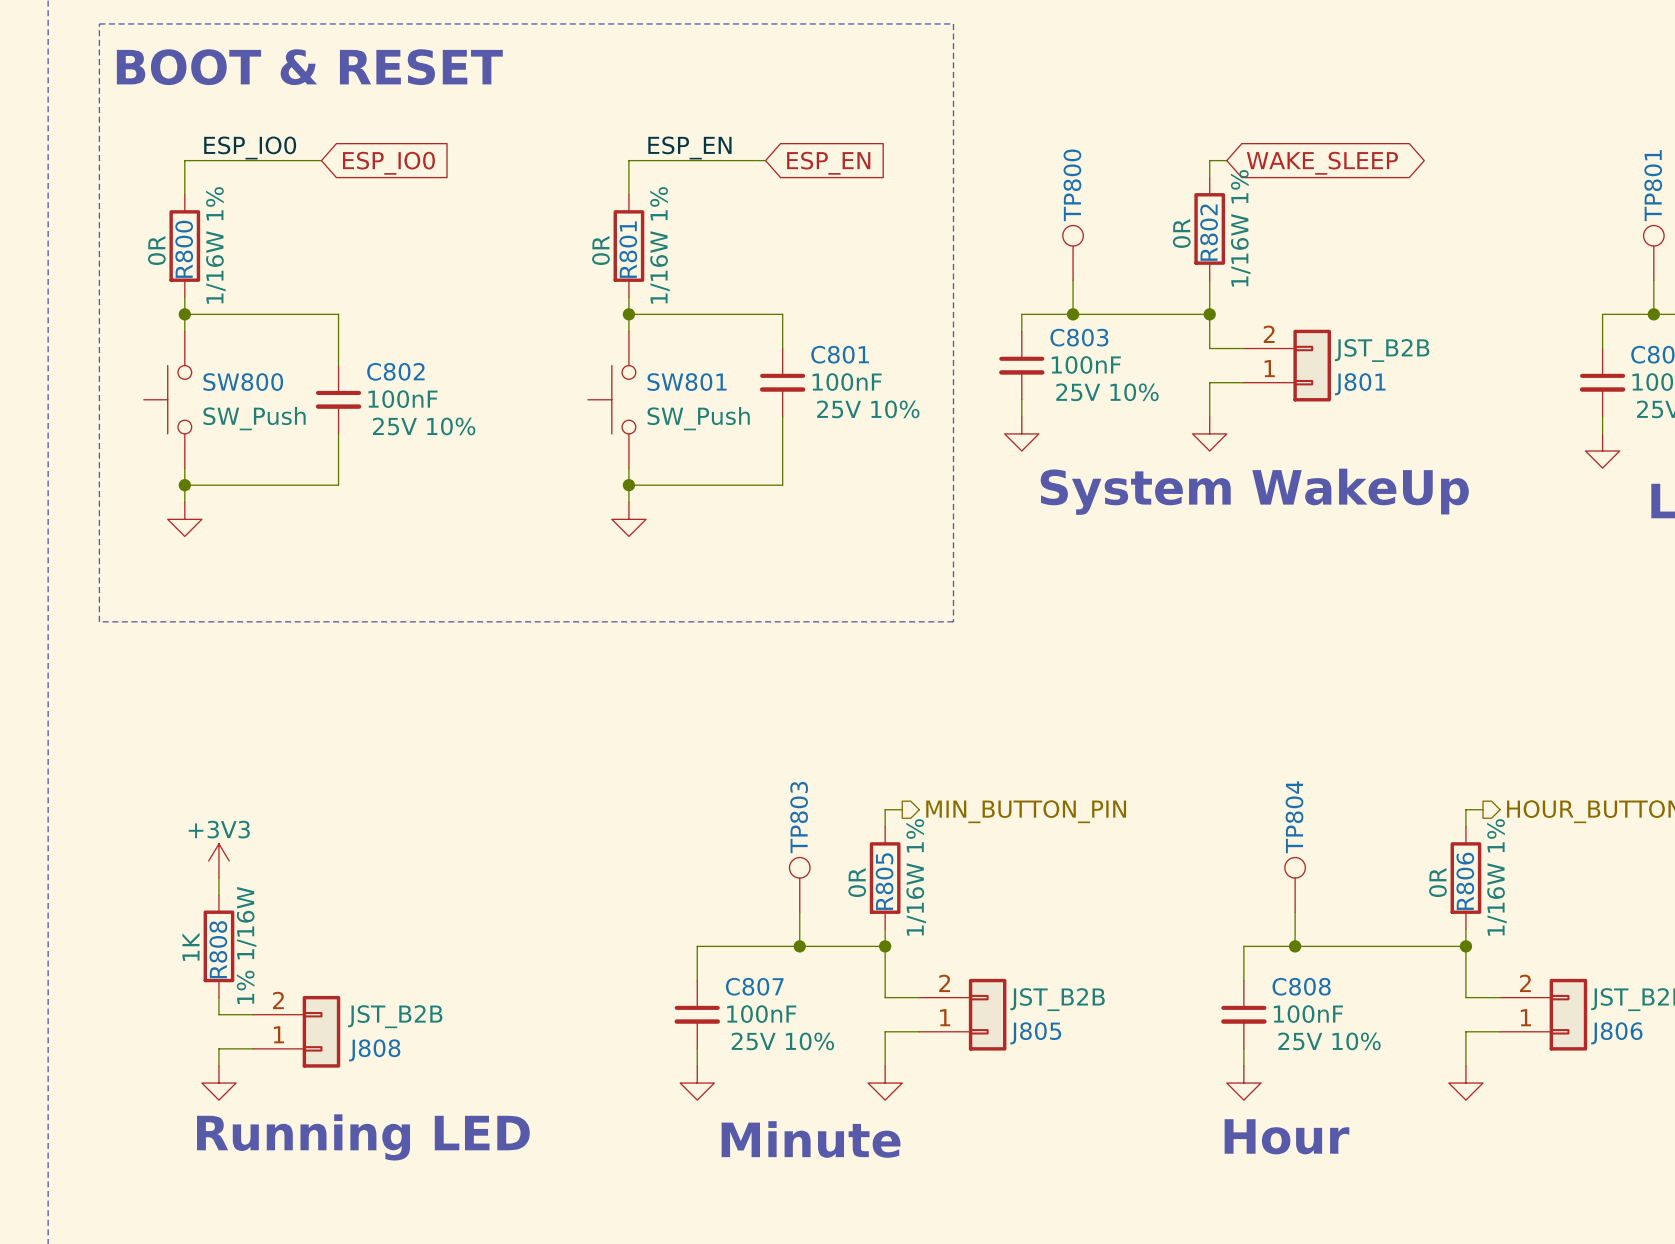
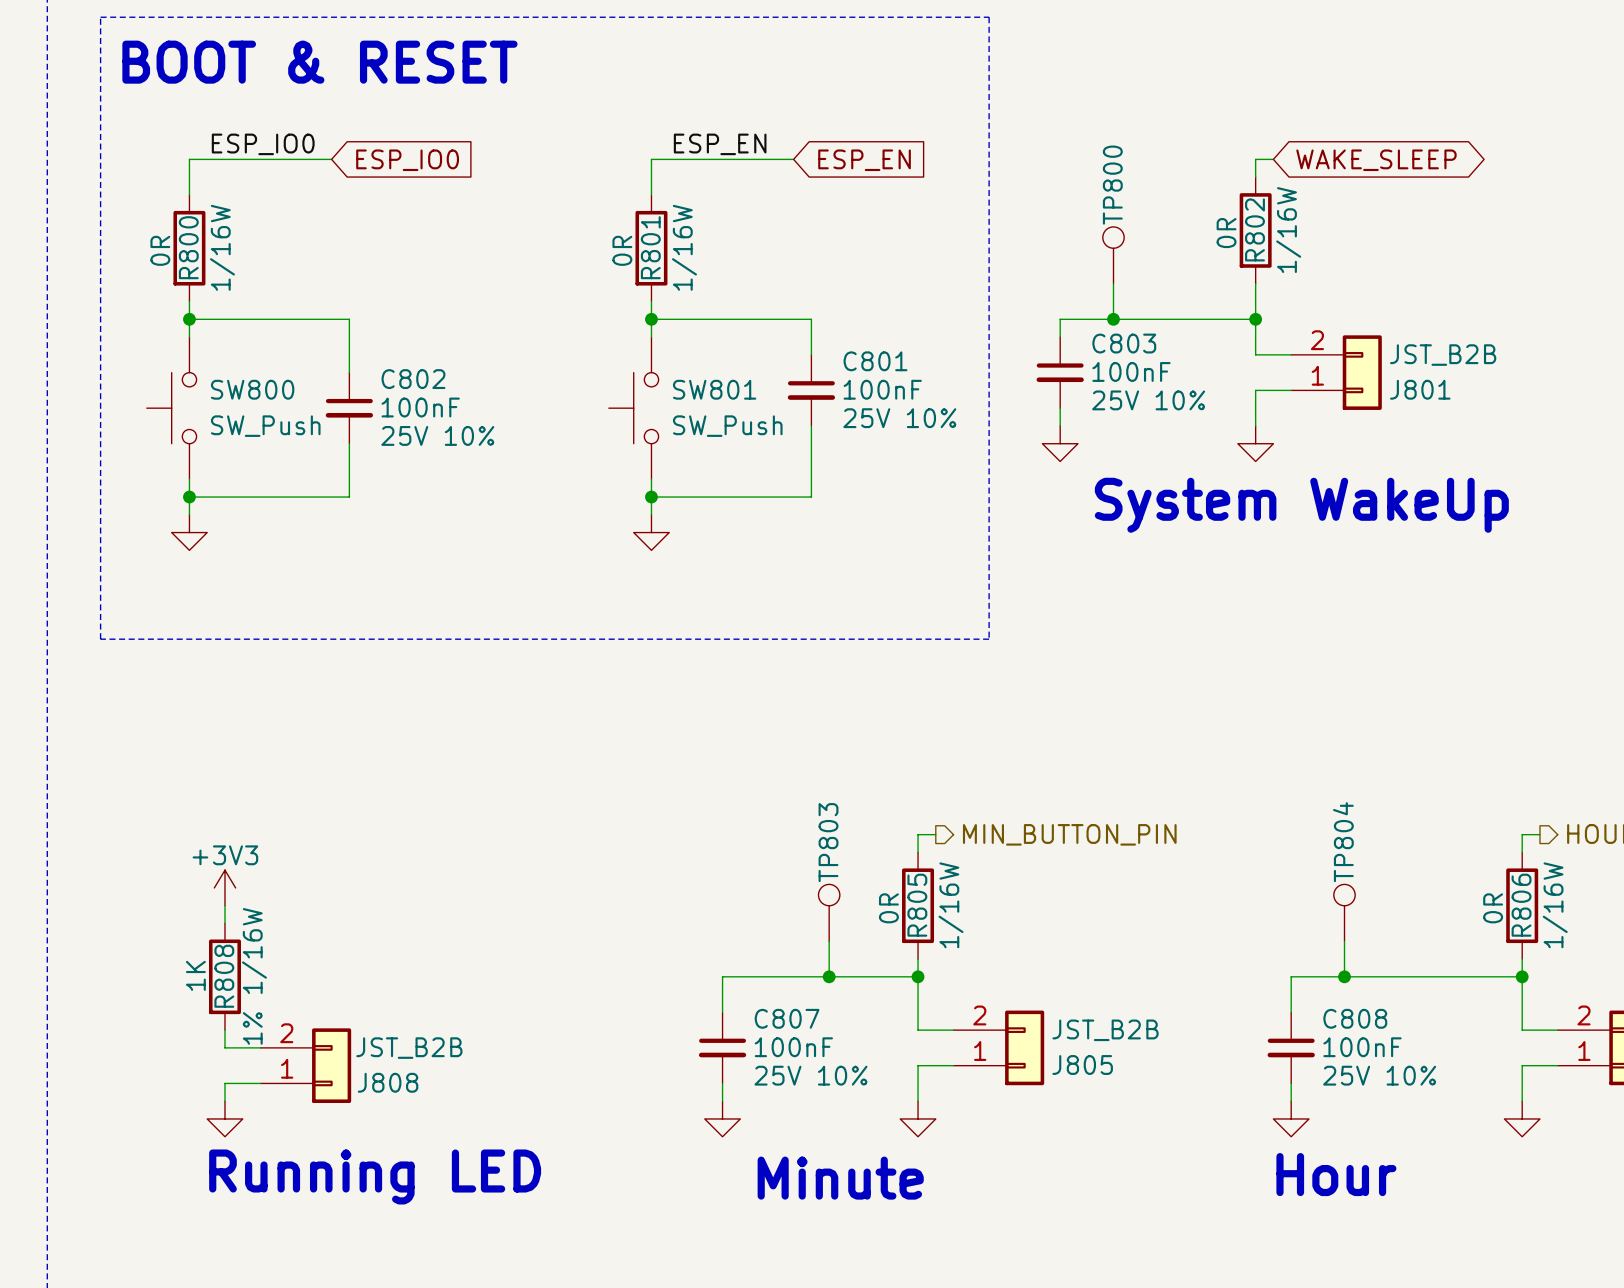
R802 text: 1/16W 1% (1240, 228) -> 1/16W (1288, 230)
R800 text: 1/16W 1% (215, 245) -> 1/16W (222, 247)
R801 text: 1/16W 1% (659, 245) -> 1/16W (684, 247)
R805 text: 1/16W 1% (916, 877) -> 1/16W (951, 905)
R806 text: 1/16W 1% (1496, 877) -> 1/16W (1555, 905)

